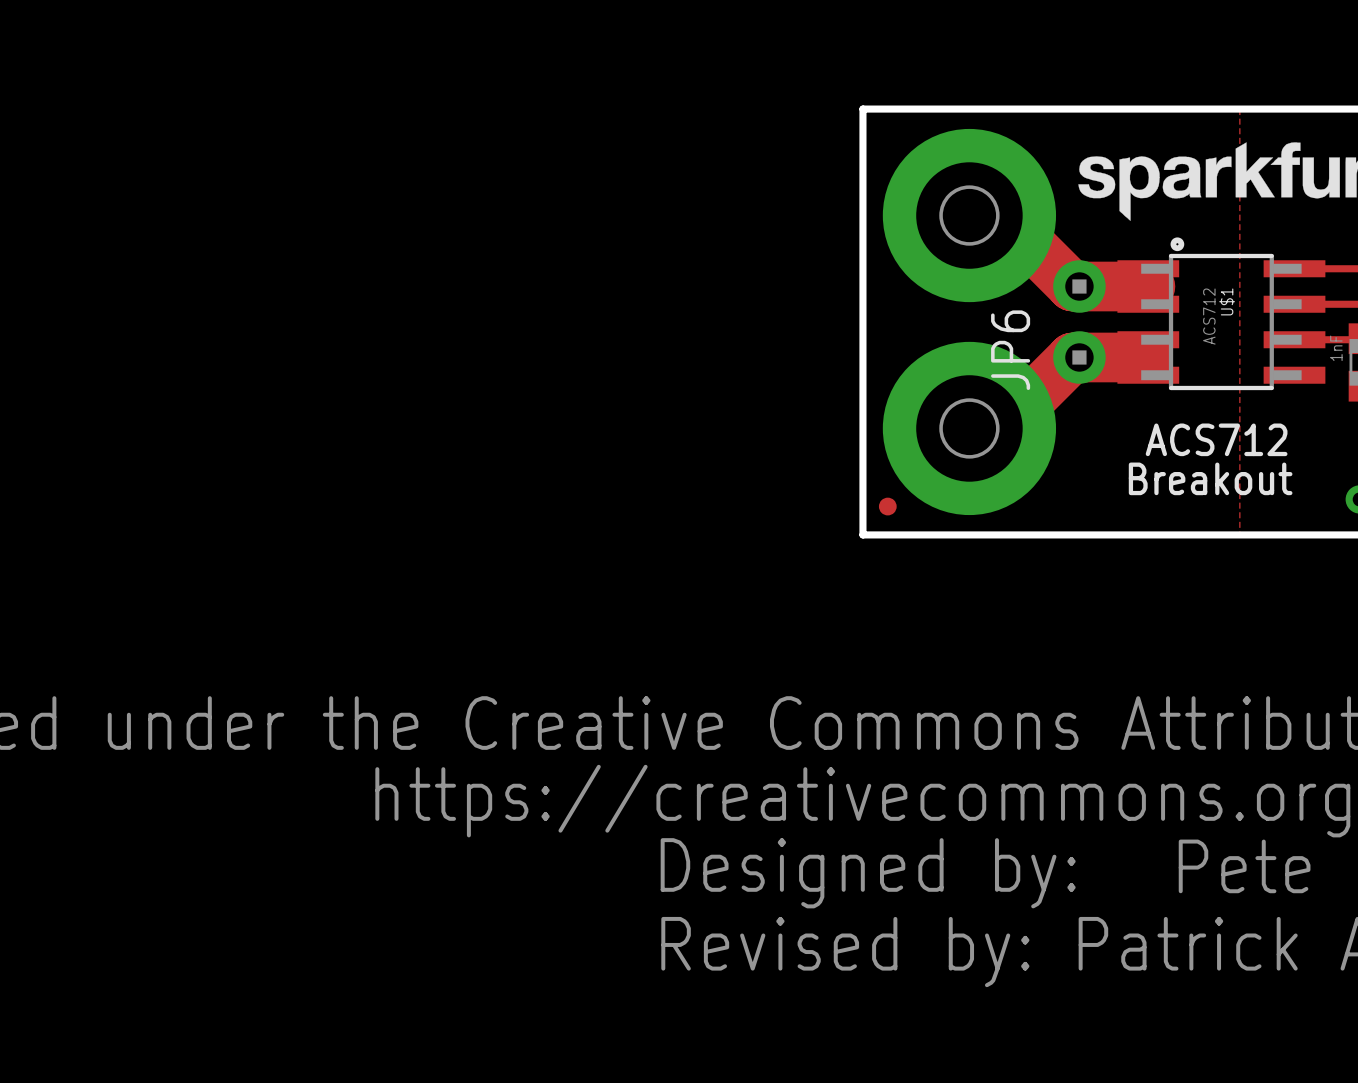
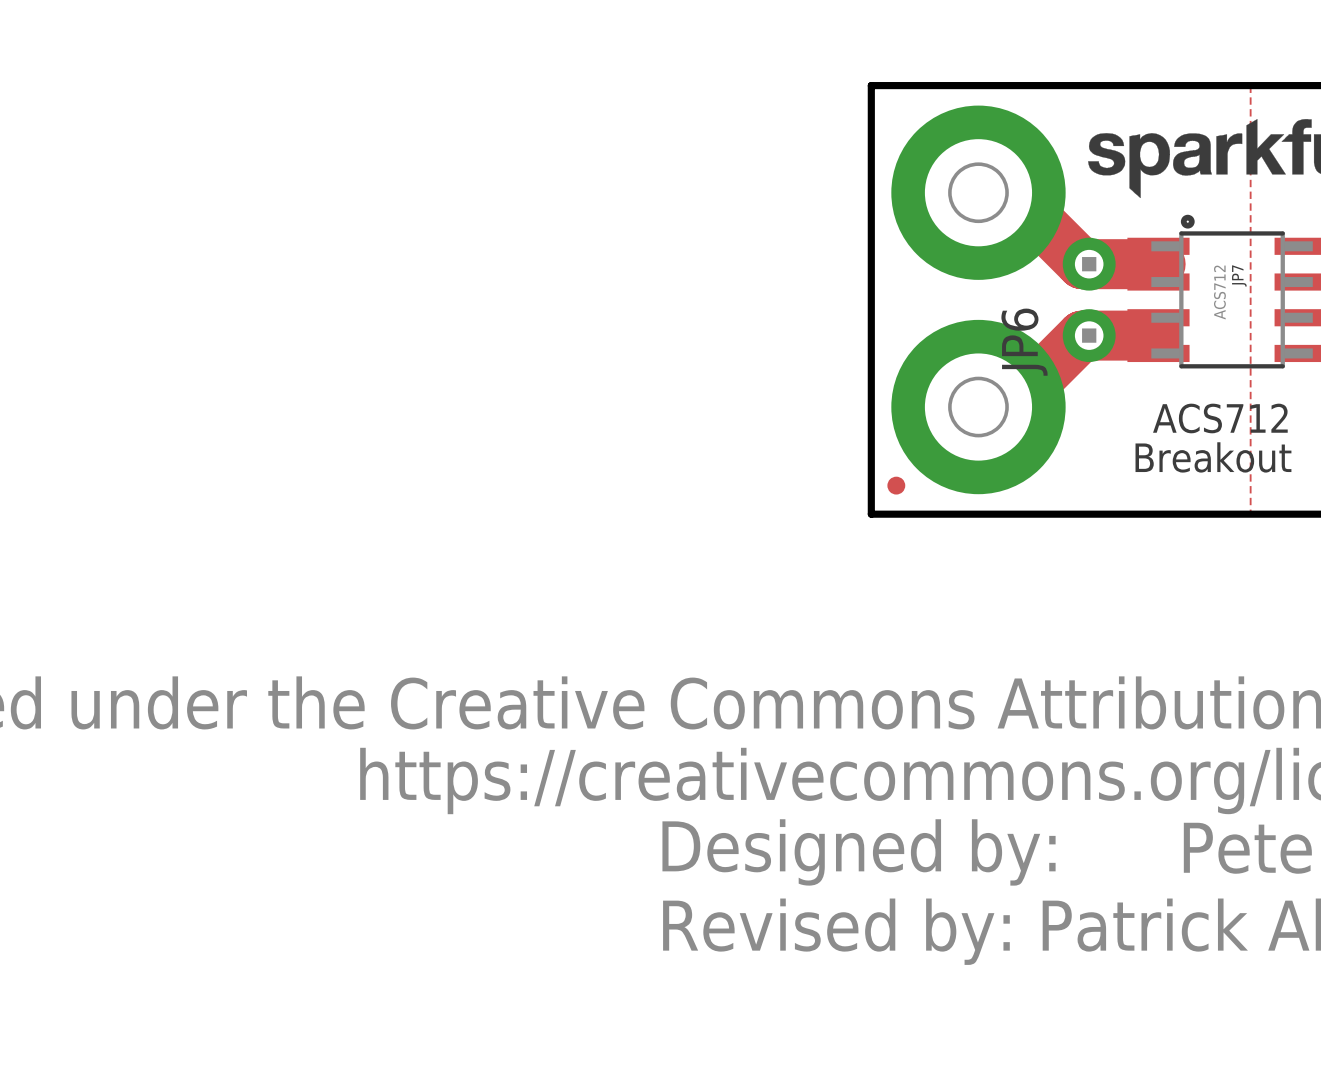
U$1 name: U$1 (1227, 301) -> JP7 (1239, 275)

